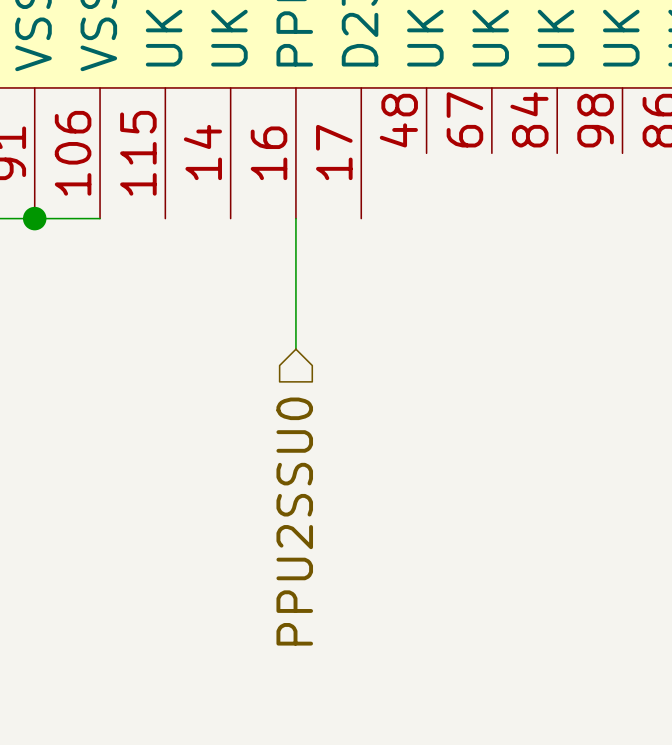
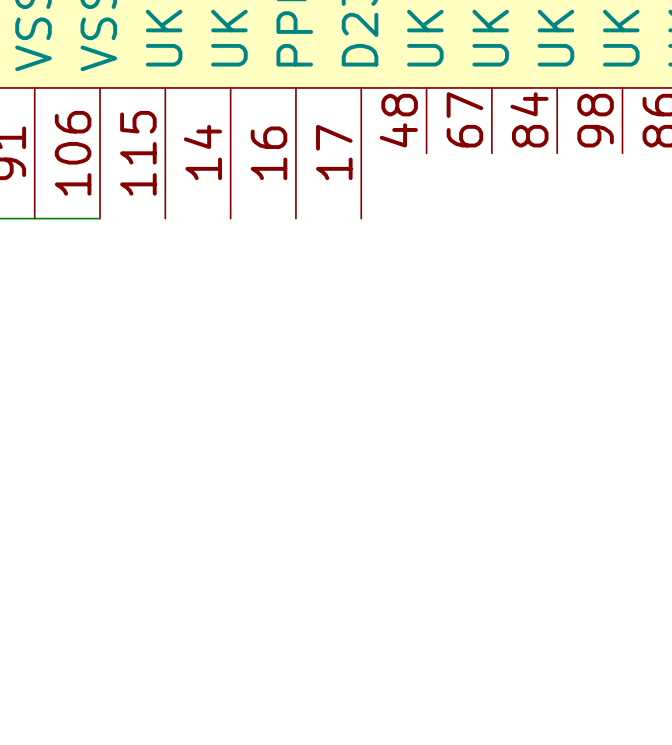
junction: (34, 218) -> none
wire: (295, 218) (295, 349) -> none
hierarchical label: PPU2SSU0 (294, 521) -> none

